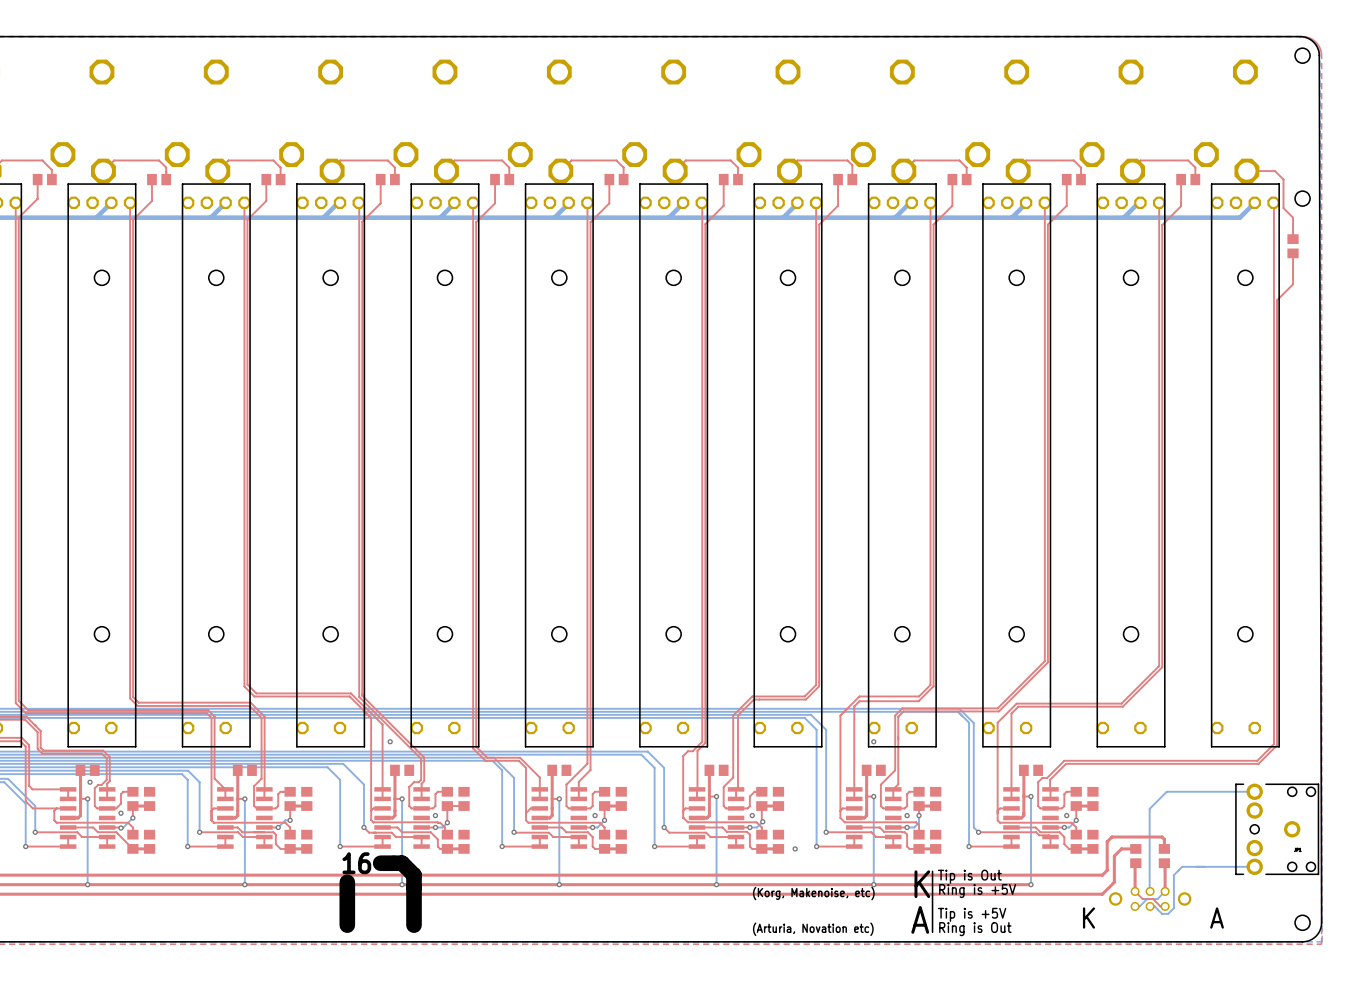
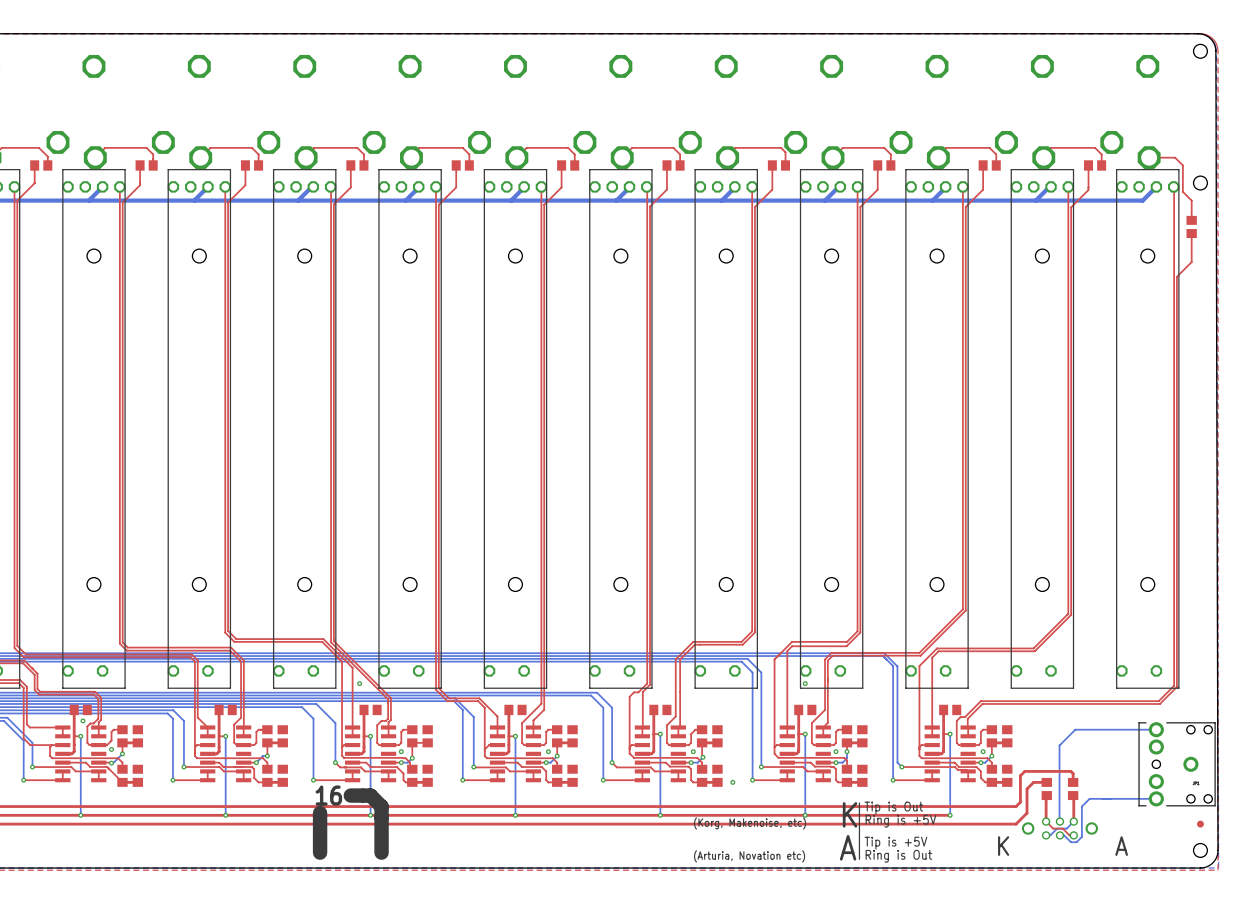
part: none -> (1200, 824)

